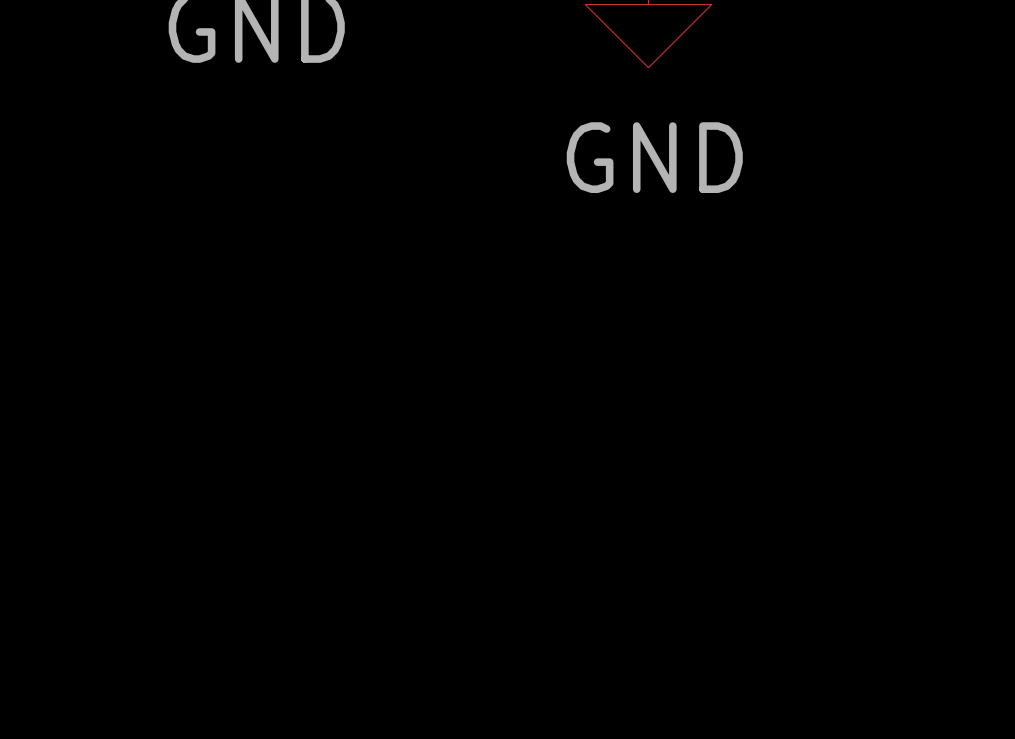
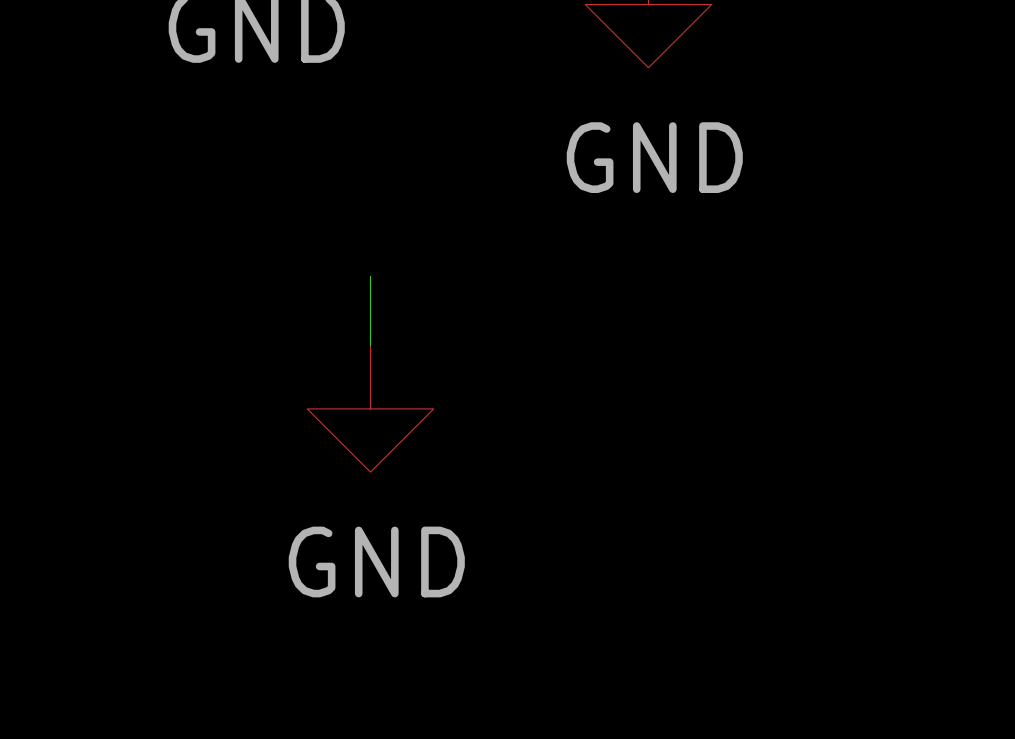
wire: none -> (370, 276) (370, 345)
power symbol: none -> GND (370, 408)

